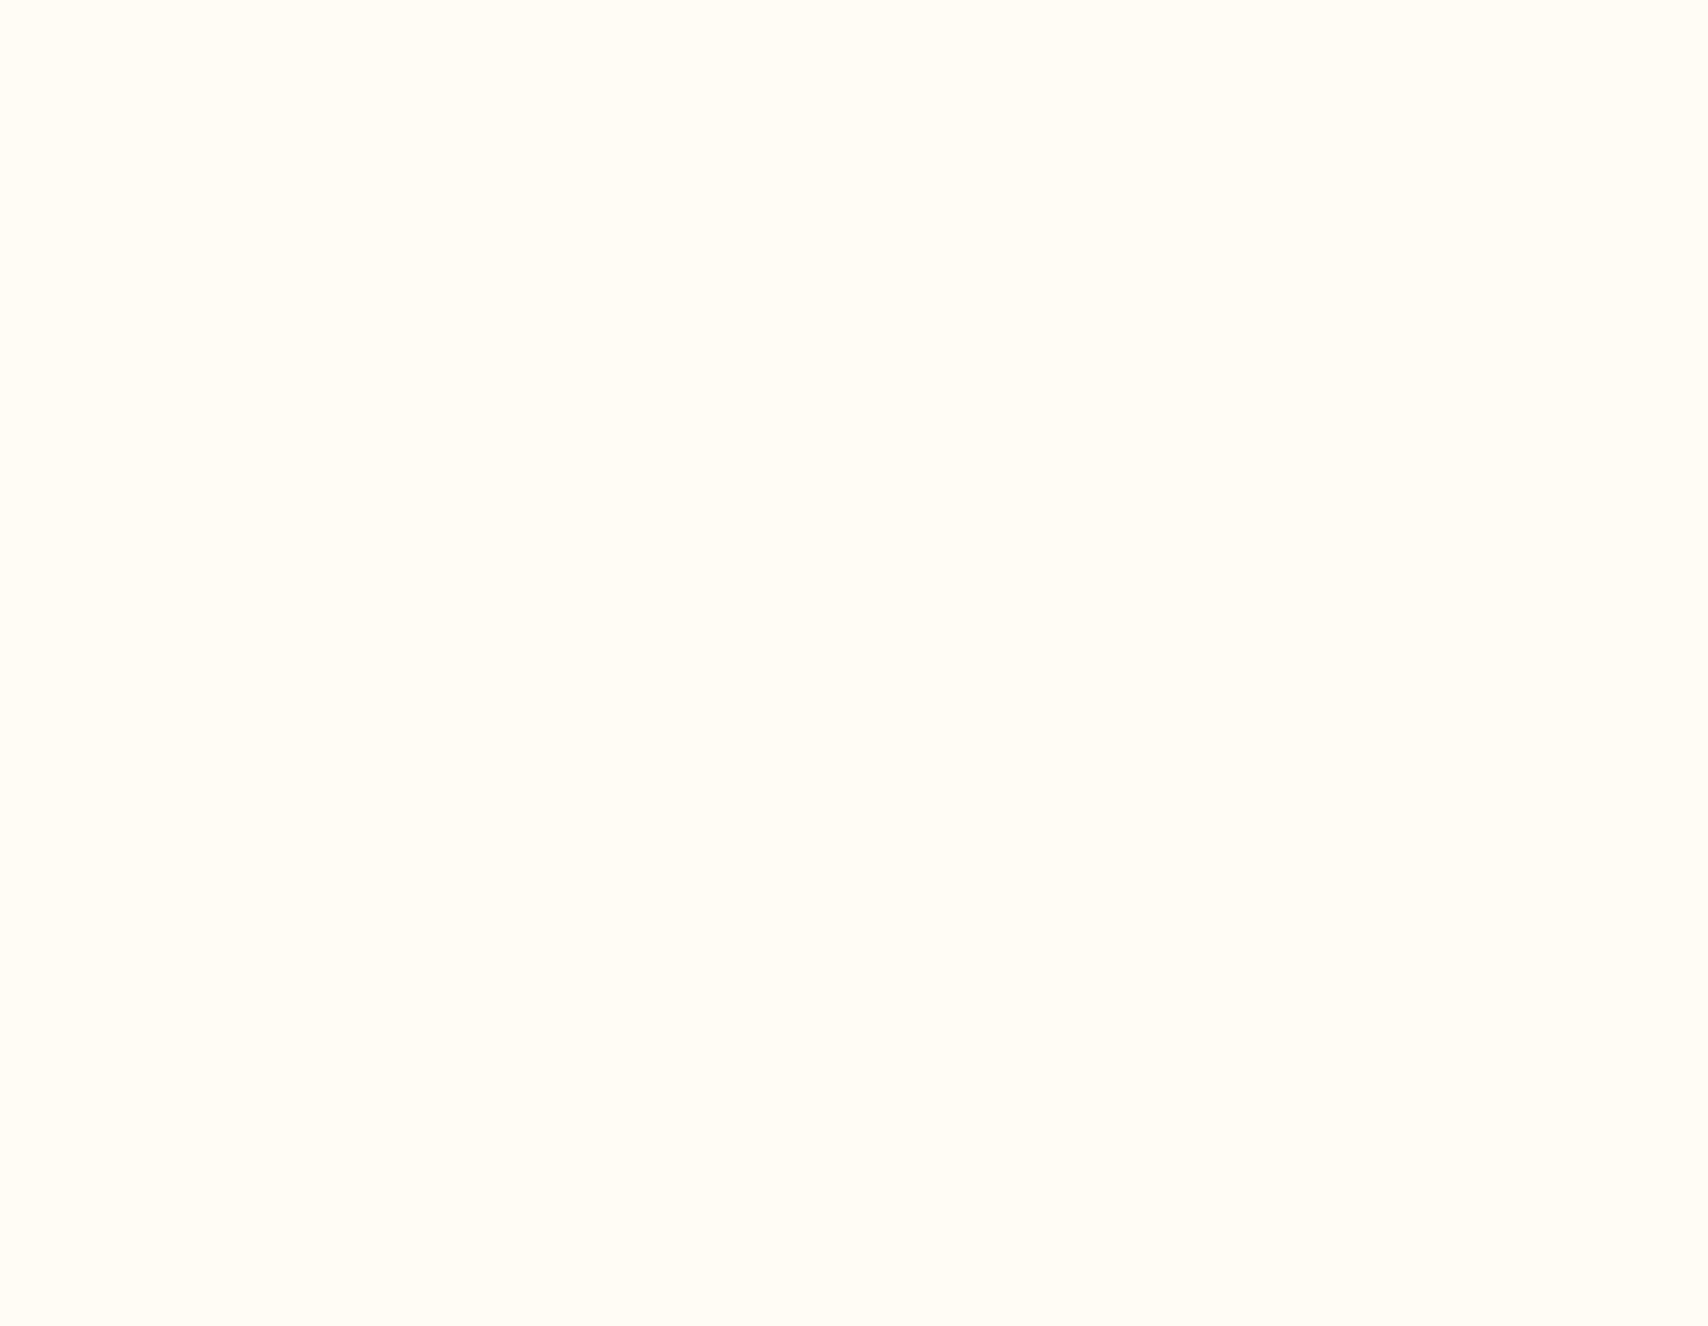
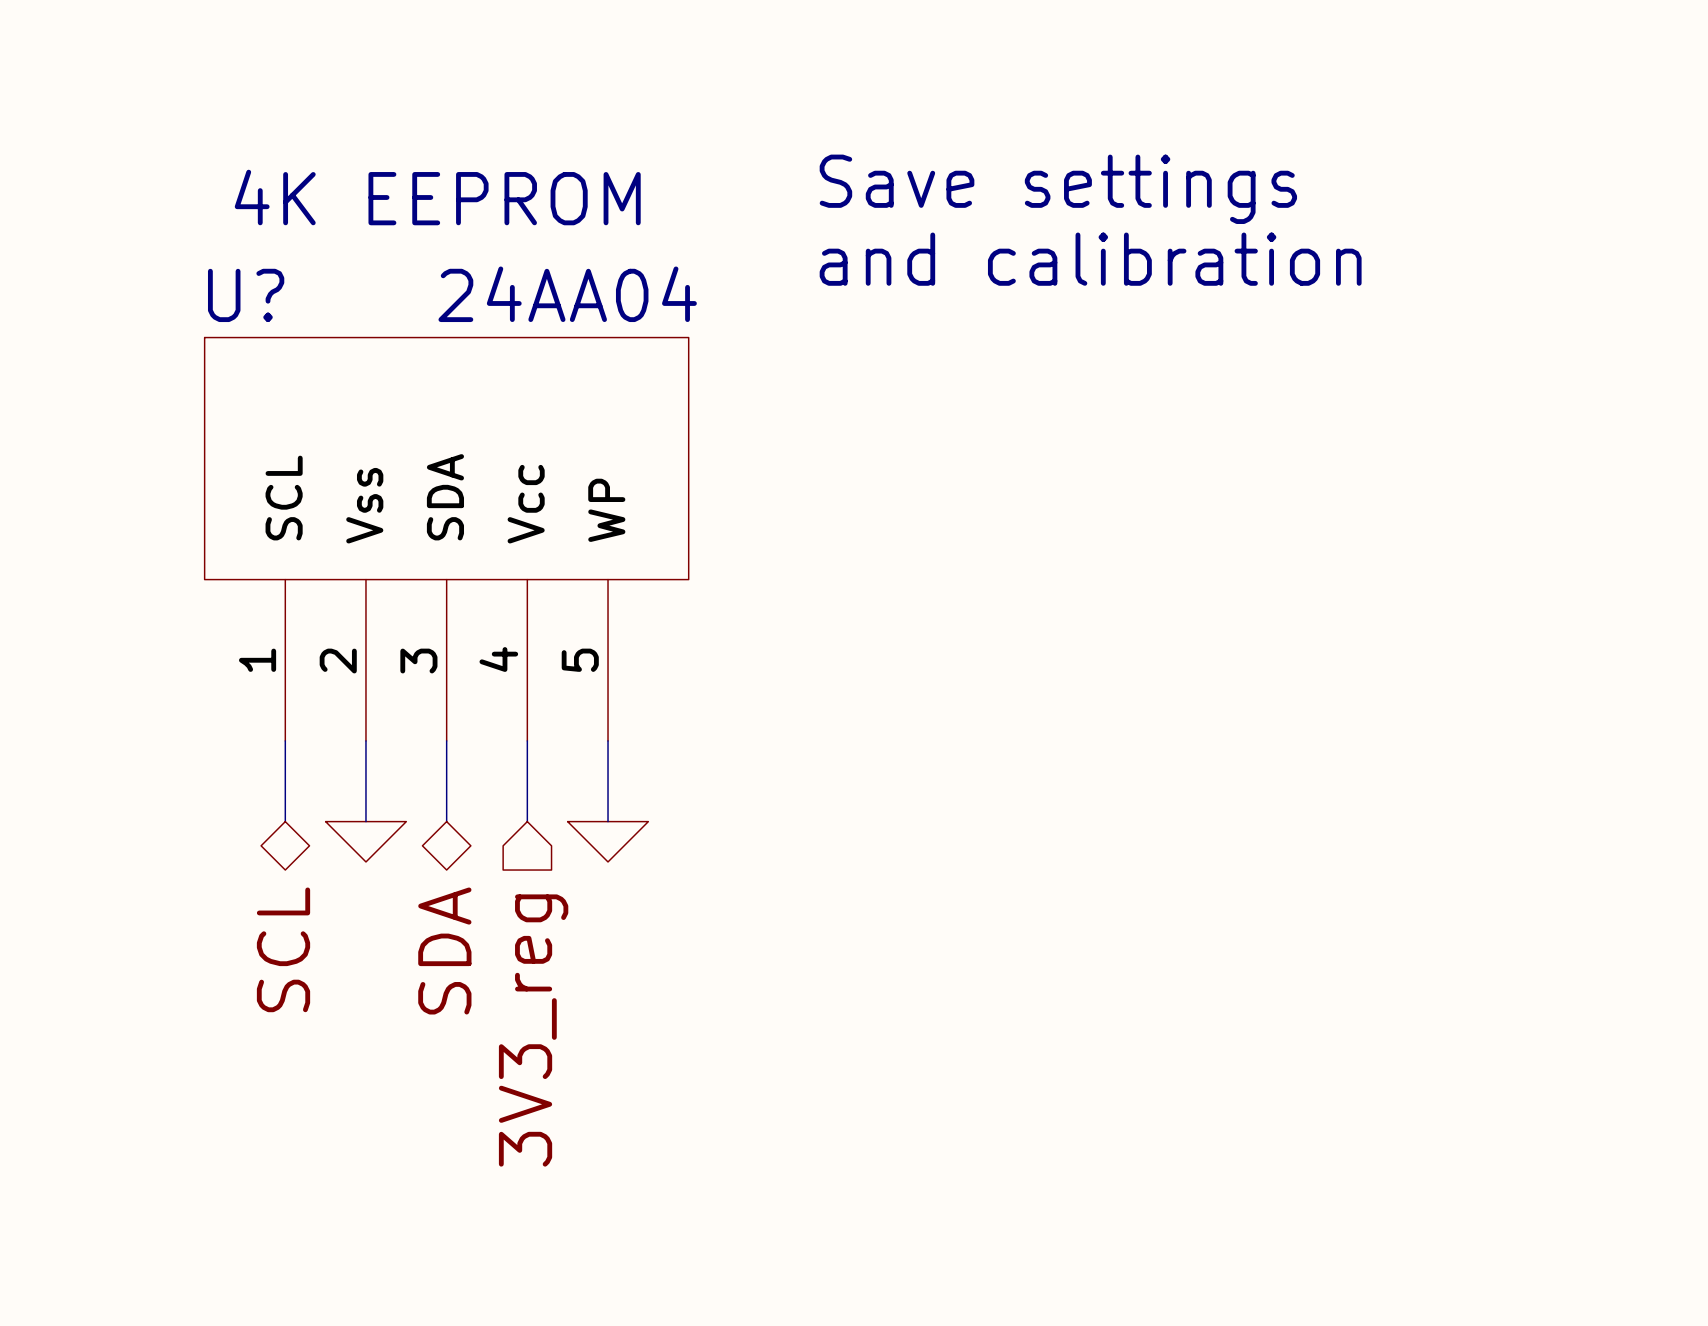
text: none -> Save settings (1058, 189)
text: none -> 4K EEPROM (437, 197)
text: none -> and calibration (1090, 259)
U?: none -> 24AA04 (446, 539)
wire: none -> (285, 740) (285, 821)
wire: none -> (365, 740) (365, 821)
wire: none -> (446, 740) (446, 821)
wire: none -> (527, 740) (527, 821)
wire: none -> (608, 740) (608, 821)
power symbol: none -> (365, 841)
power symbol: none -> (608, 841)
hierarchical label: none -> SCL (283, 949)
hierarchical label: none -> SDA (444, 951)
hierarchical label: none -> 3V3_reg (533, 1030)

